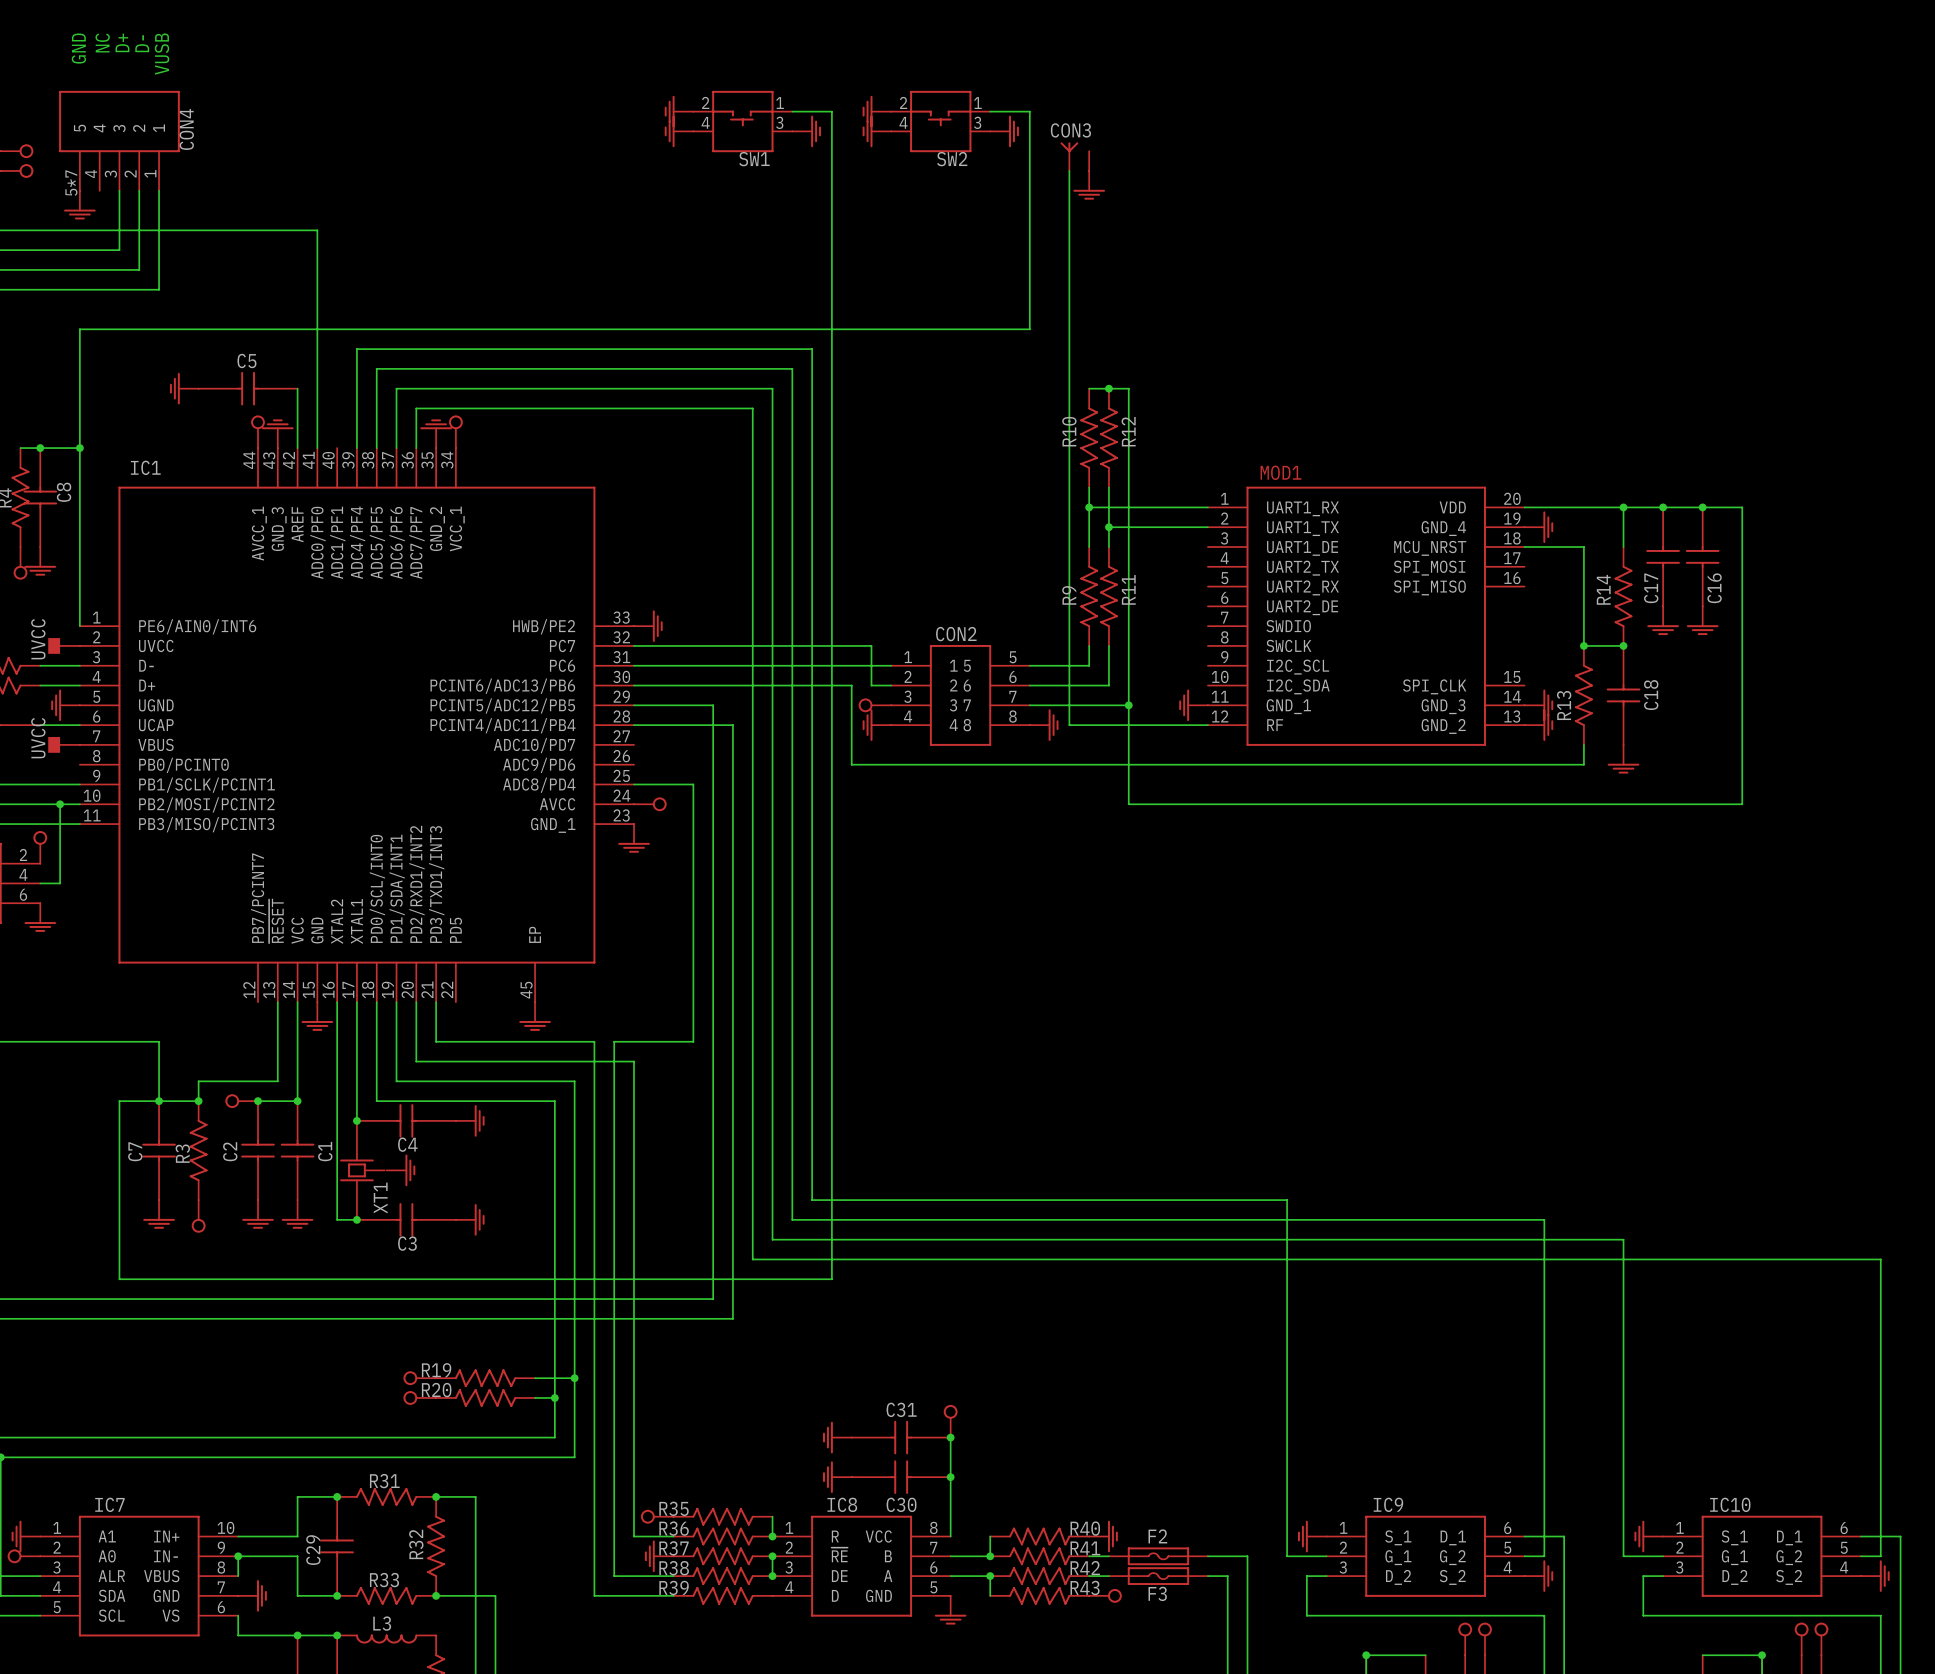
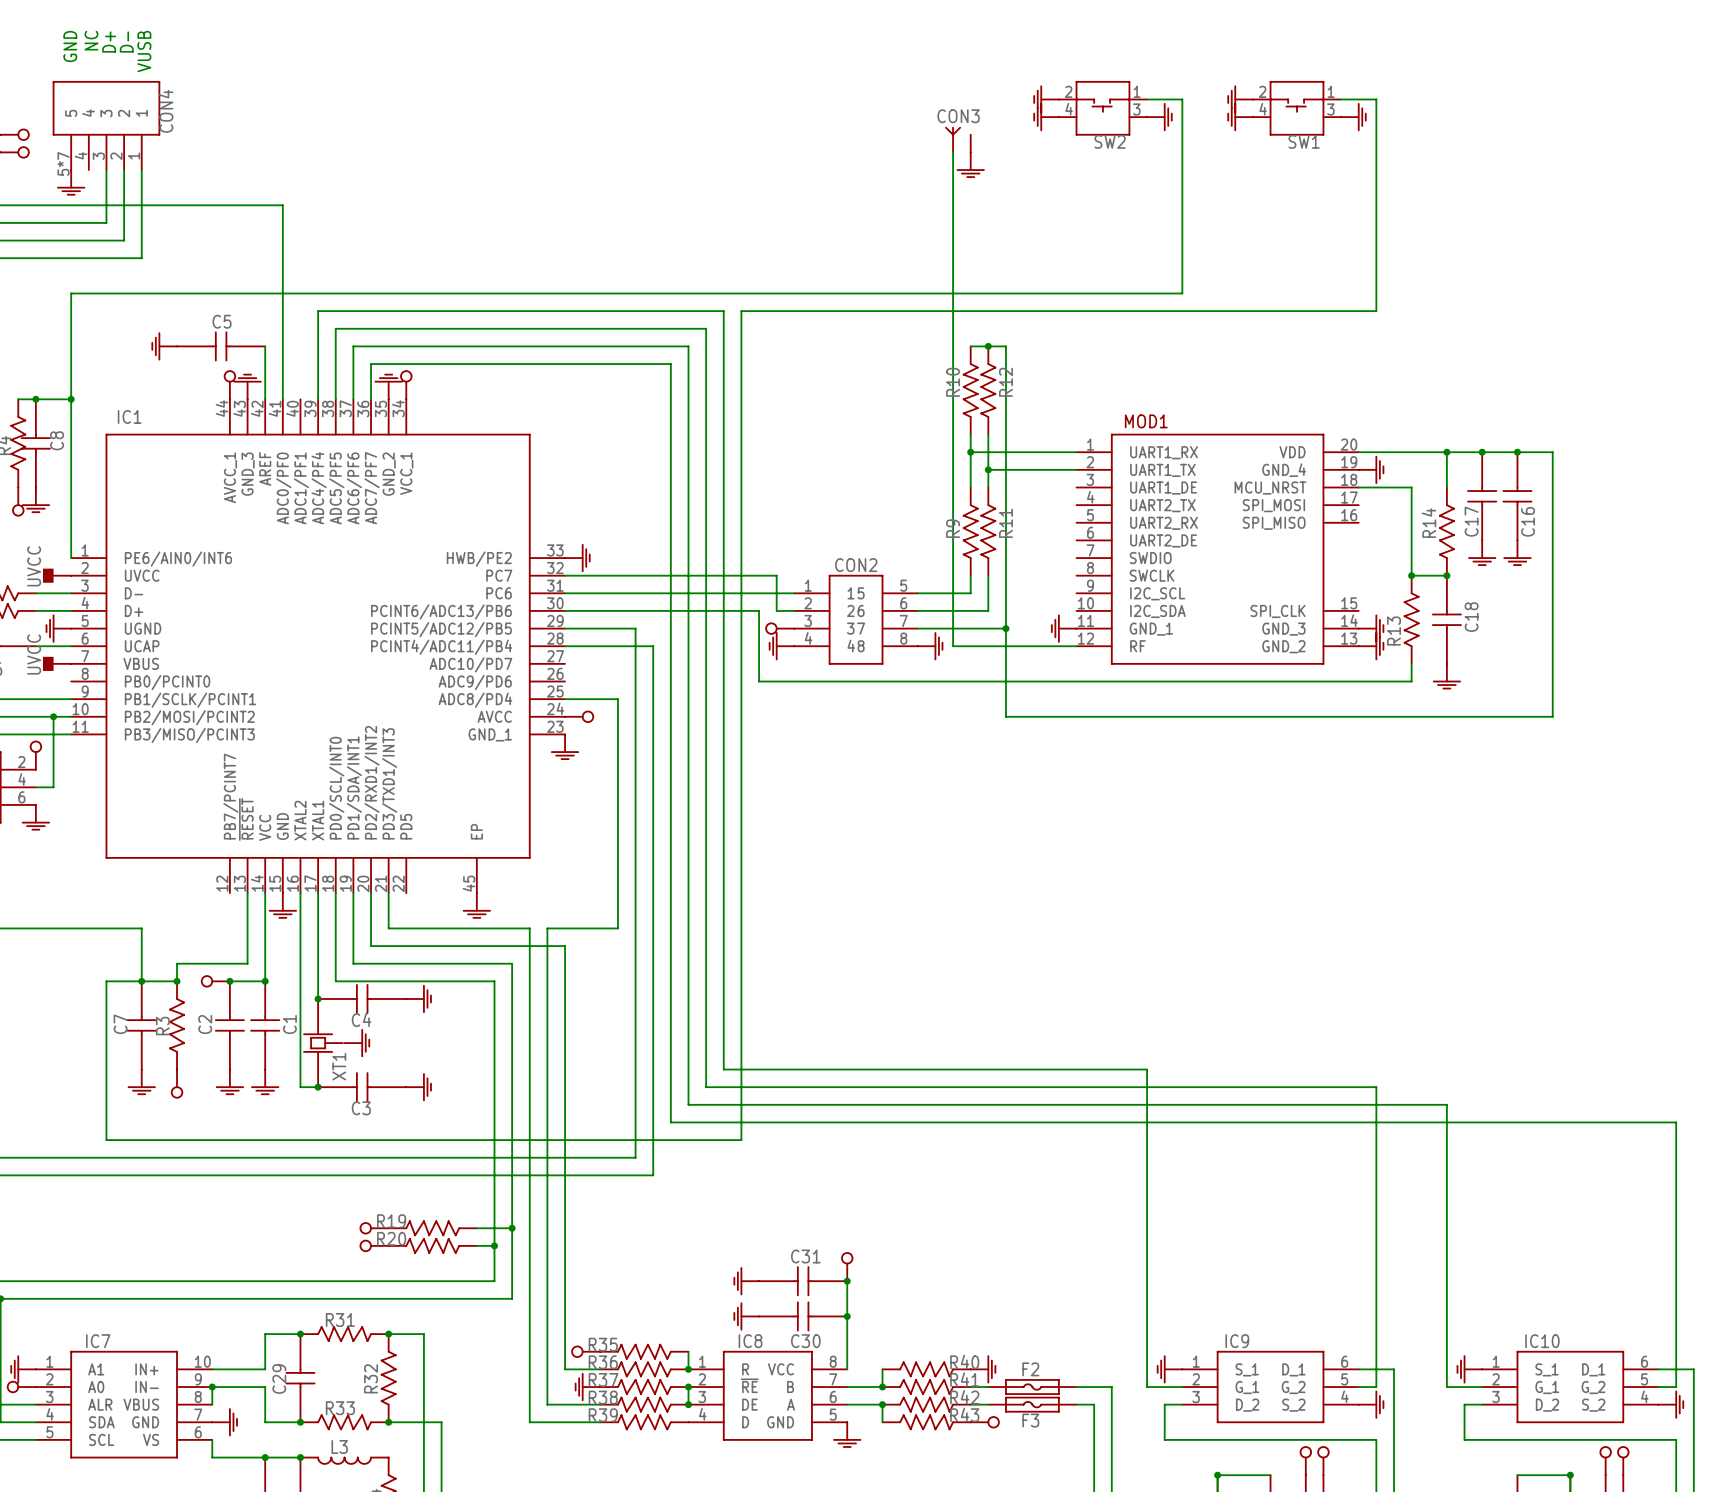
power symbol: (679, 111) -> none
wire: (792, 111) (831, 111) (831, 349) -> (1341, 99) (1376, 99) (1376, 311) (741, 311)
power symbol: (876, 111) -> none
wire: (990, 111) (1029, 111) (1029, 329) -> (1147, 99) (1182, 99) (1182, 293) (917, 293)
power symbol: none -> (1046, 99)
power symbol: none -> (1240, 99)
SW1 position: (742, 121) -> (1296, 108)
SW2 position: (940, 121) -> (1102, 108)
power symbol: (679, 131) -> none
power symbol: (806, 131) -> none
power symbol: (876, 131) -> none
power symbol: (1004, 131) -> none
power symbol: none -> (1046, 117)
power symbol: none -> (1159, 117)
power symbol: none -> (1240, 117)
power symbol: none -> (1353, 117)

